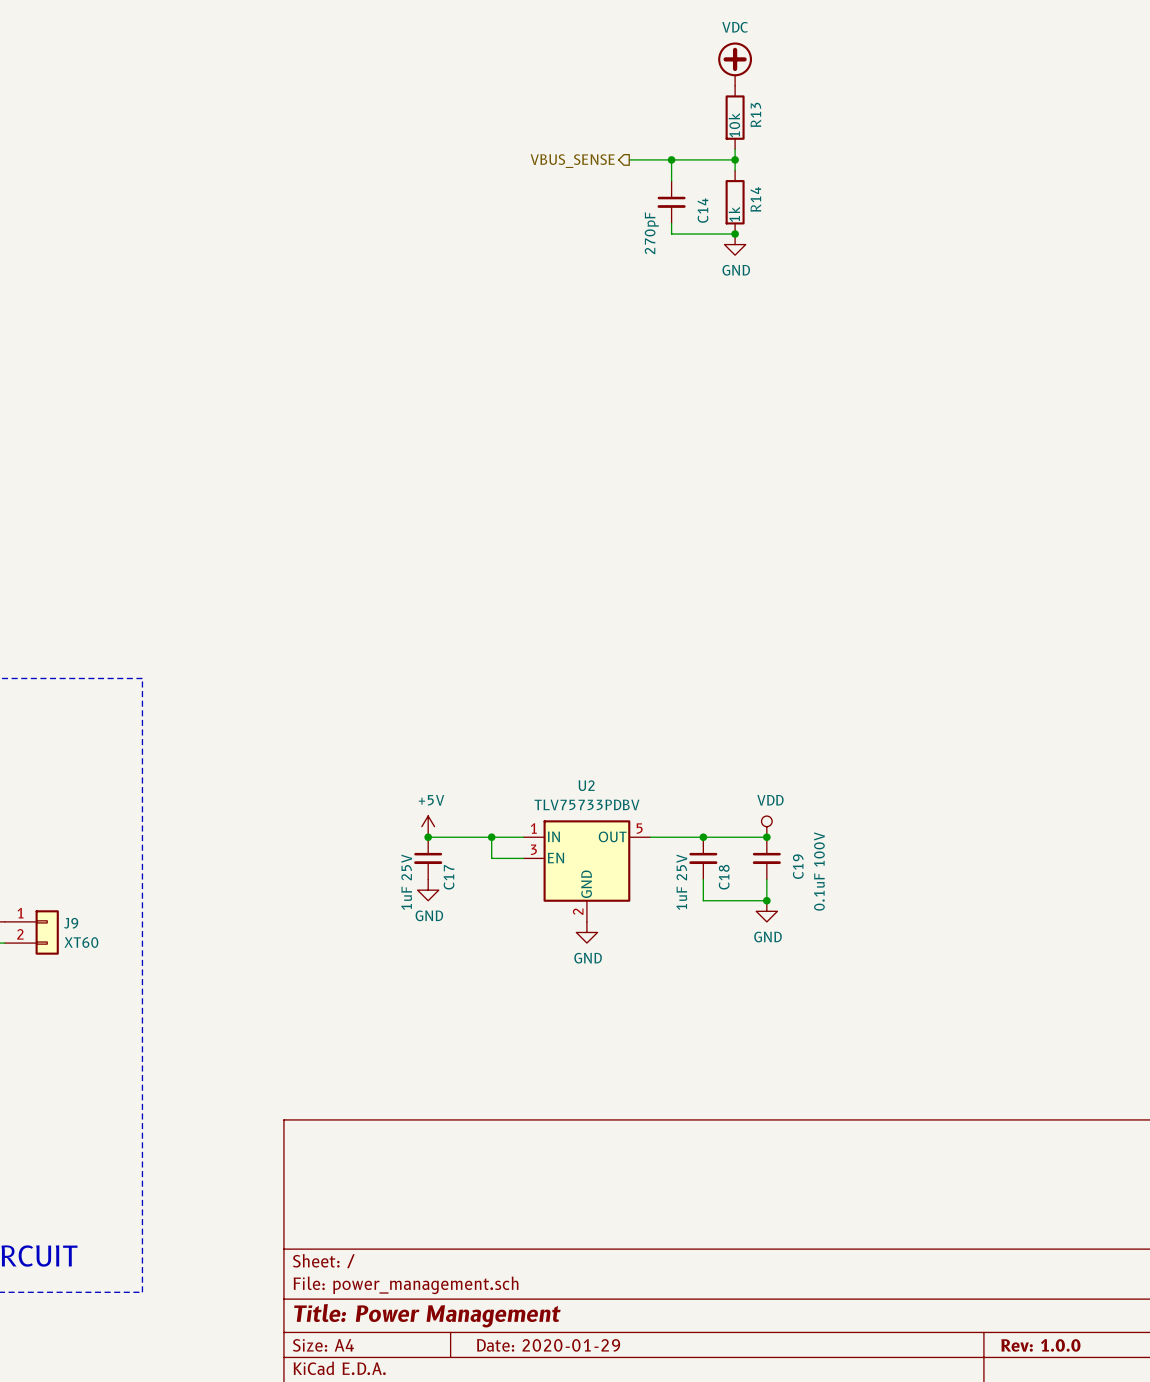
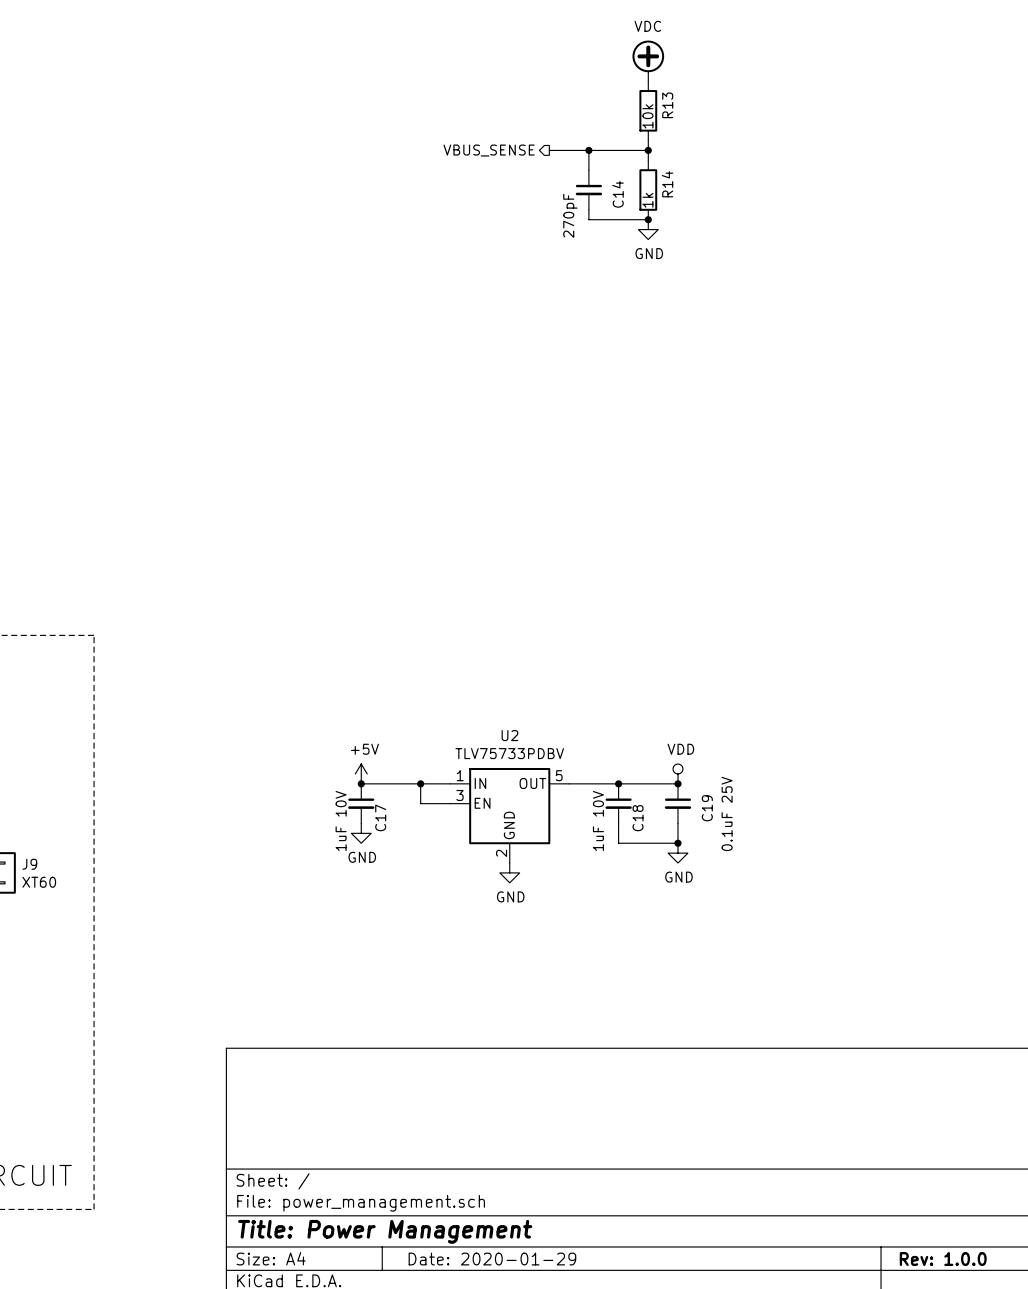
C19 value: 0.1uF 100V (819, 871) -> 0.1uF 25V (727, 813)
C17 value: 1uF 25V (406, 882) -> 1uF 10V (341, 821)
C18 value: 1uF 25V (681, 882) -> 1uF 10V (598, 821)

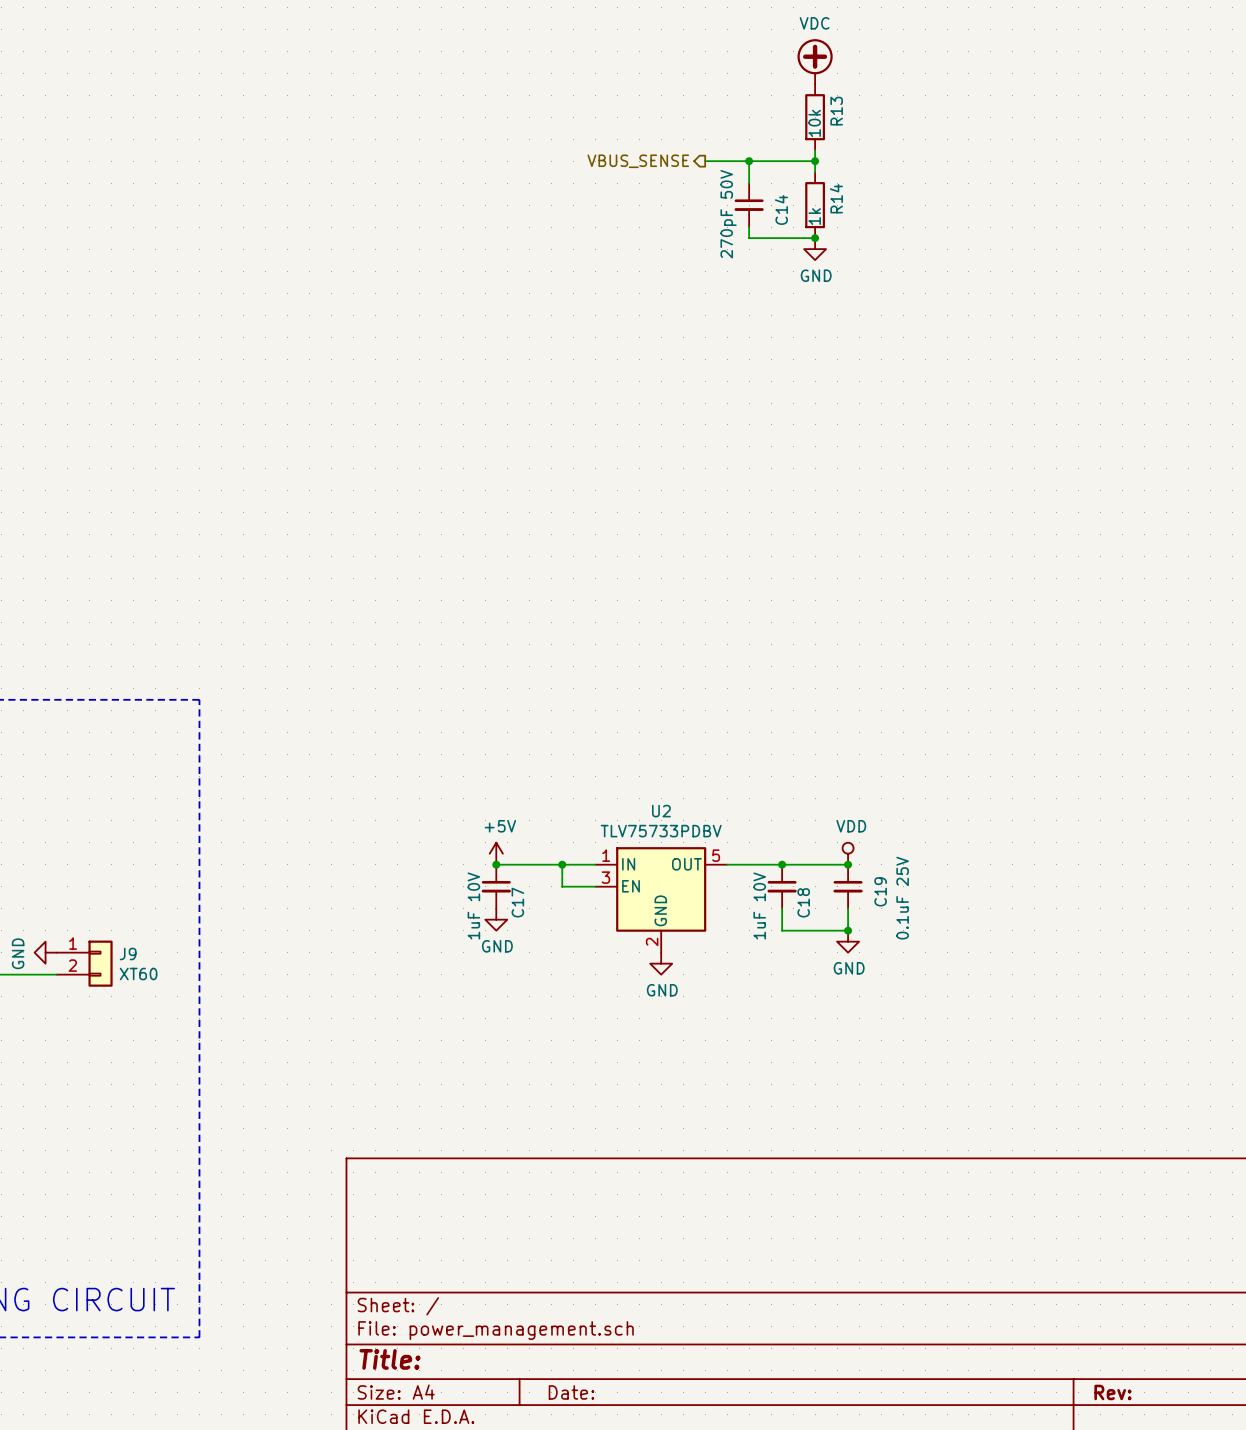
C14 value: 270pF (570, 215) -> 270pF 50V (728, 214)
title block: Title: Power Management (385, 1231) -> Title: (390, 1359)
title block: Date: 2020-01-29 (492, 1259) -> Date: (571, 1392)
title block: Rev: 1.0.0 (943, 1259) -> Rev: (1112, 1392)

